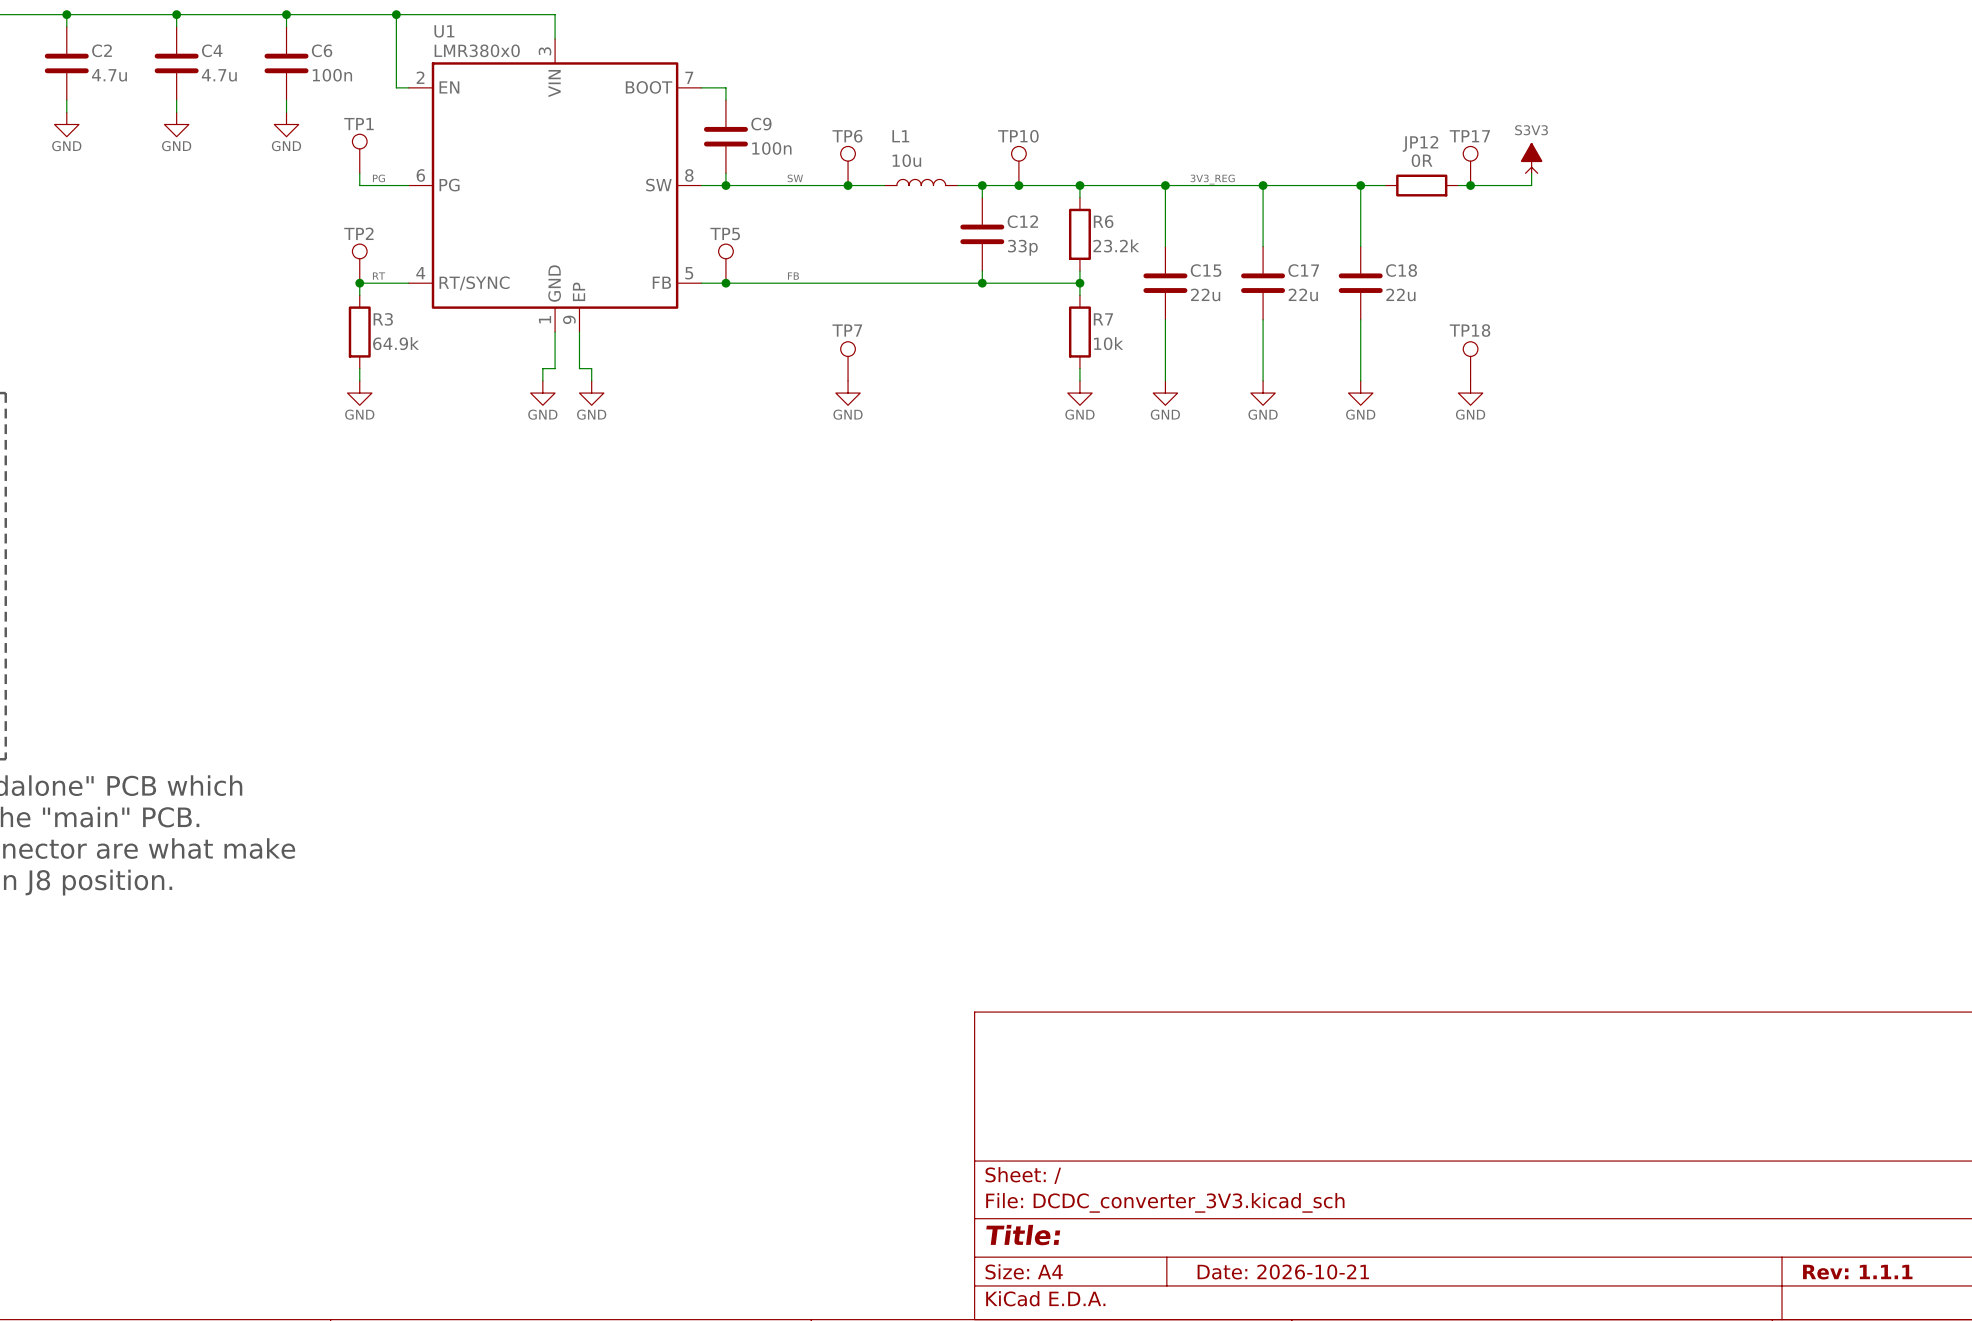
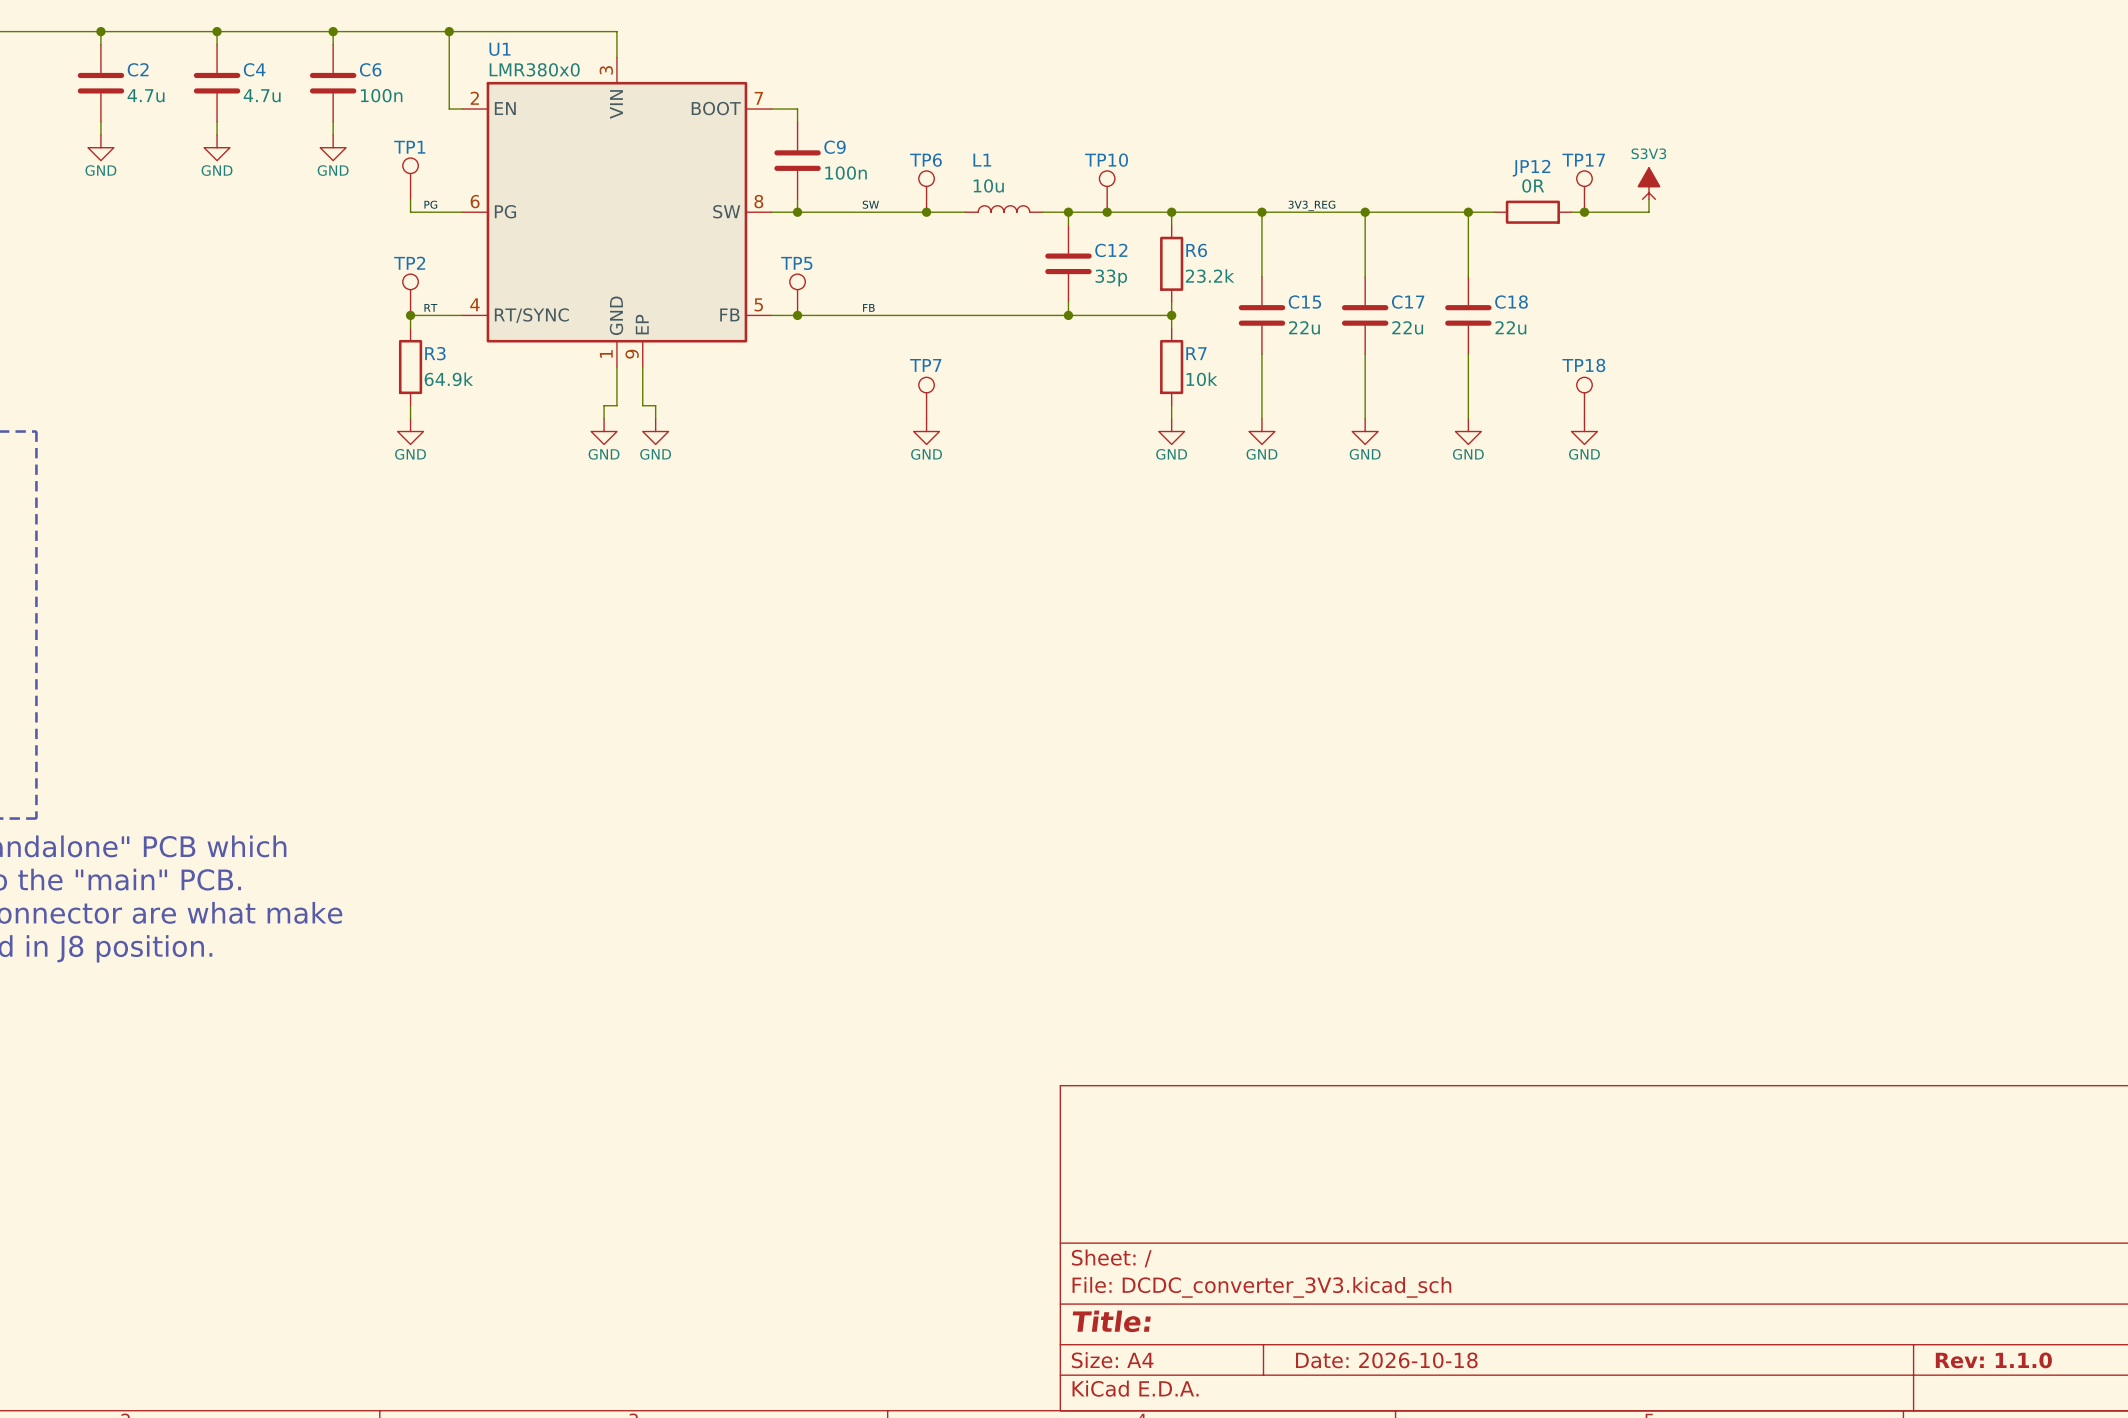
title block: Date: 2026-10-21 (1283, 1272) -> Date: 2026-10-18 (1386, 1360)
title block: Rev: 1.1.1 (1857, 1272) -> Rev: 1.1.0 (1993, 1360)

